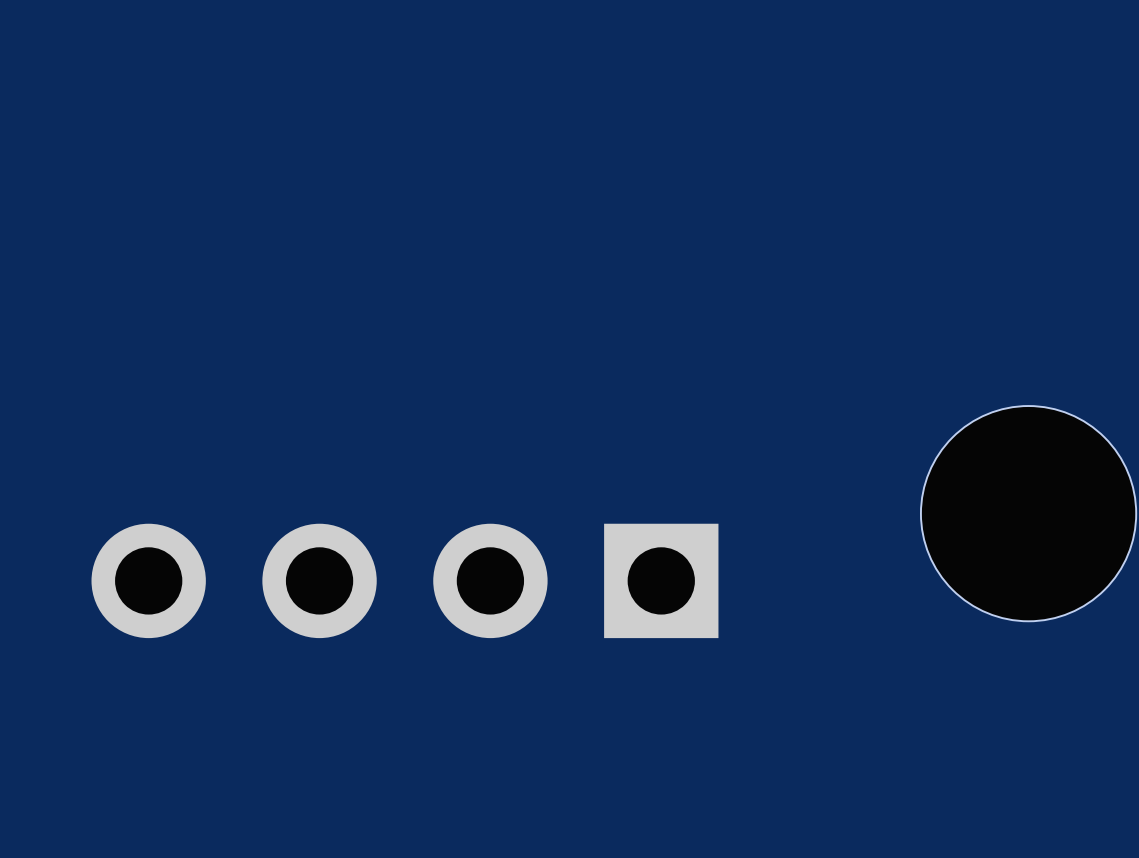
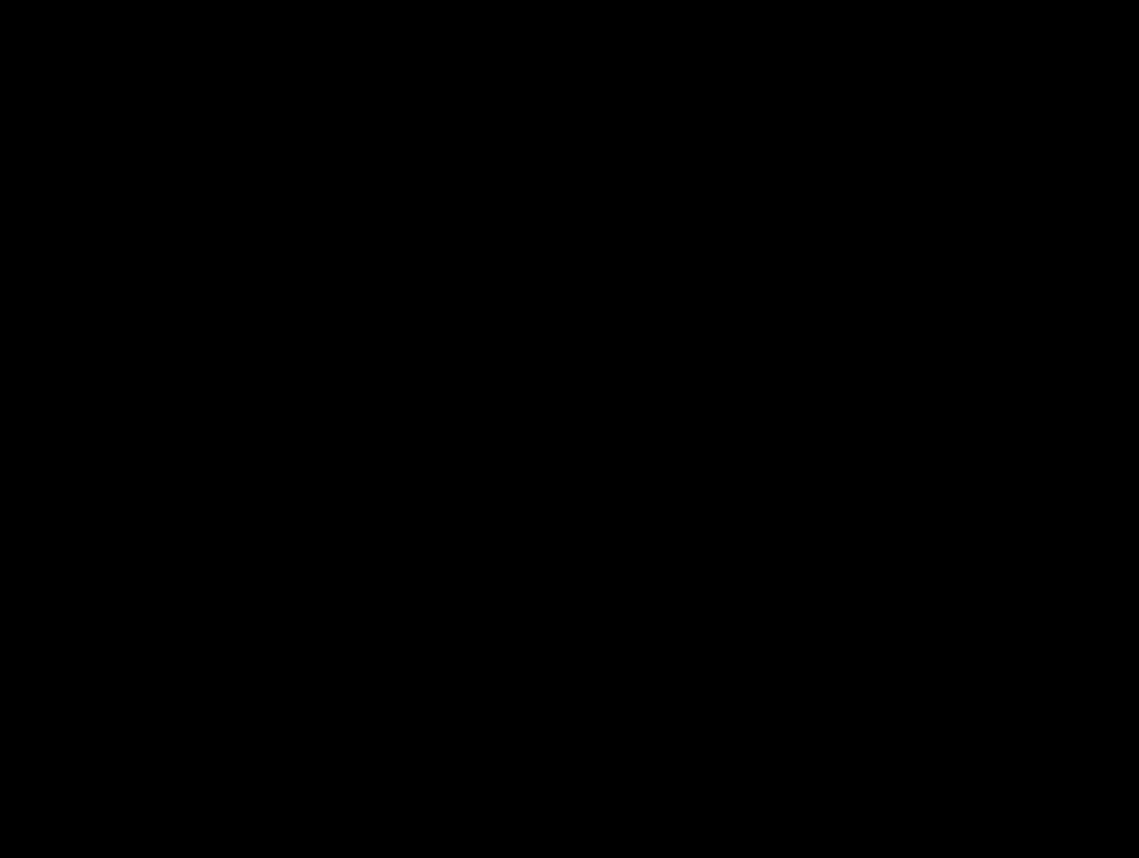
part: (1028, 513) -> none
part: (404, 580) -> none

